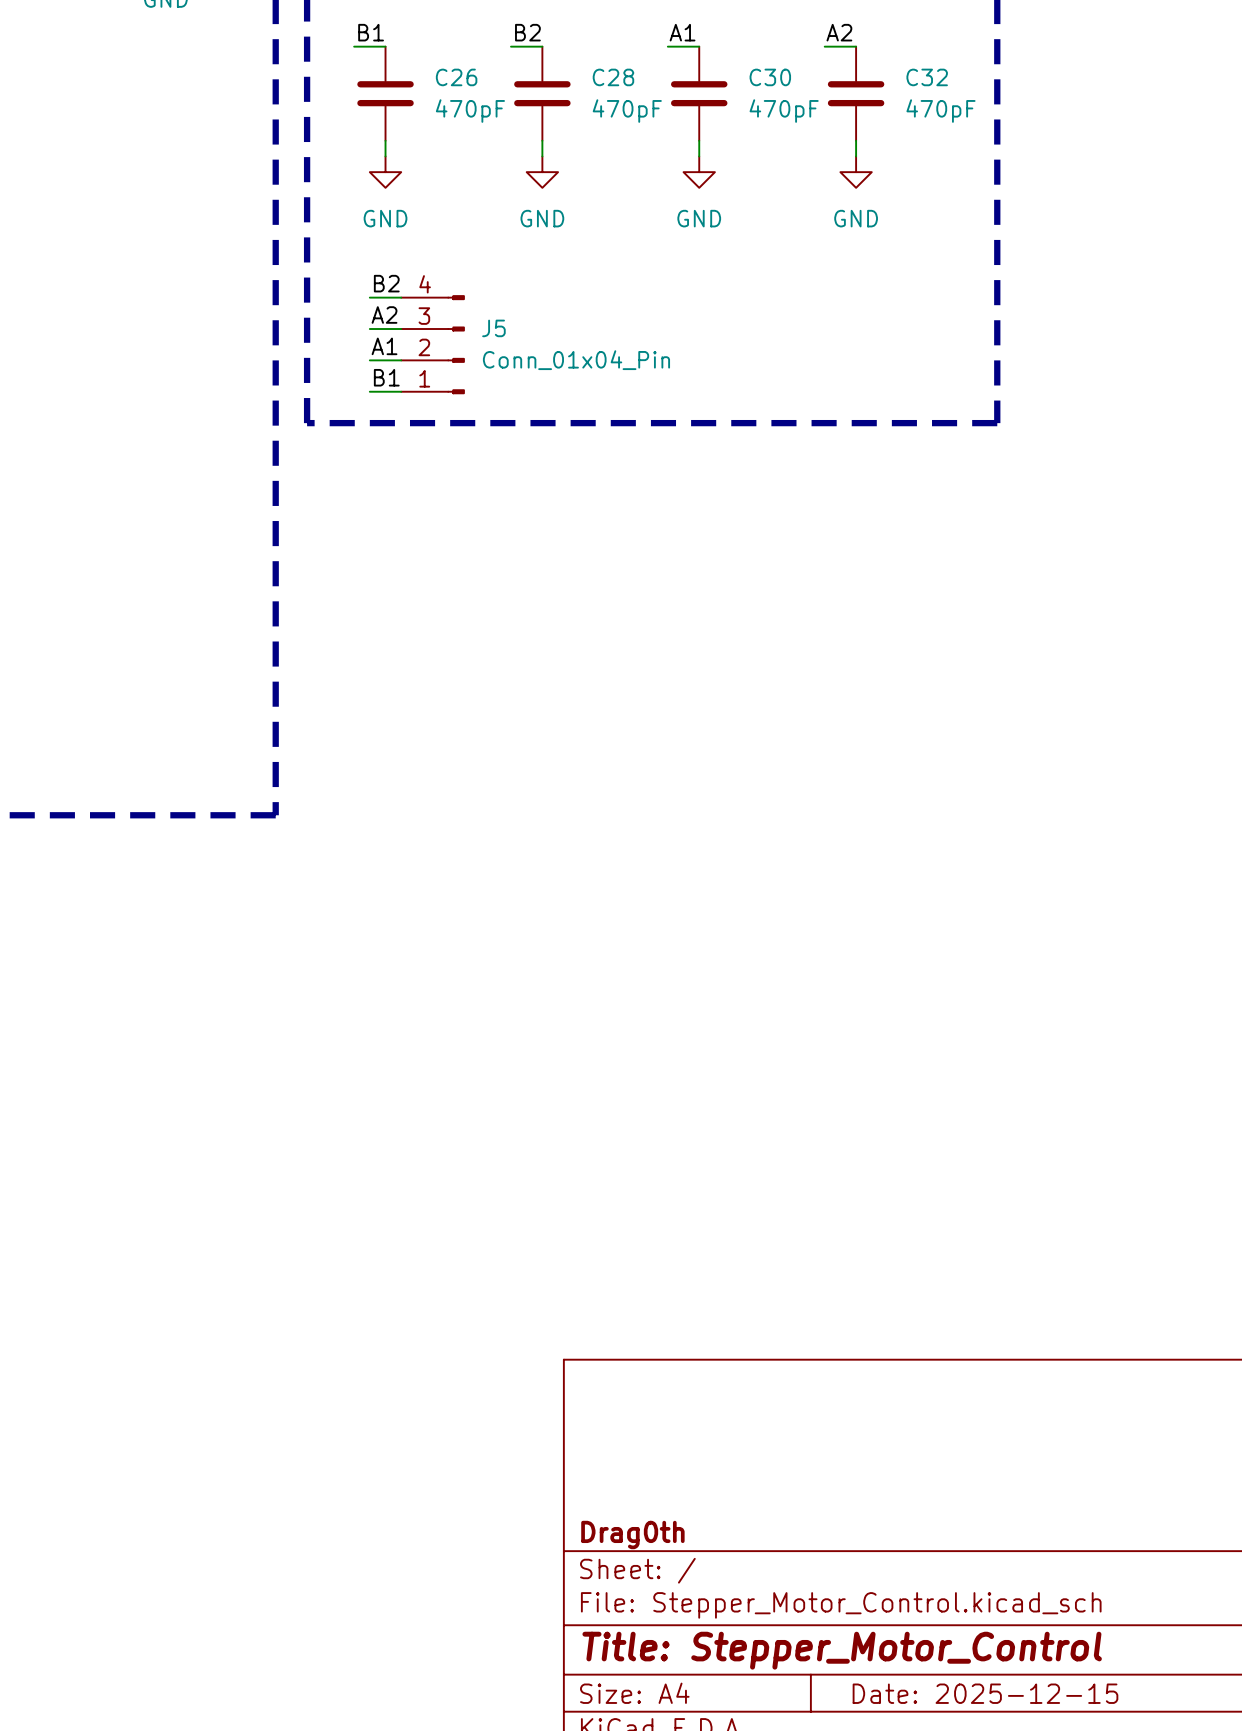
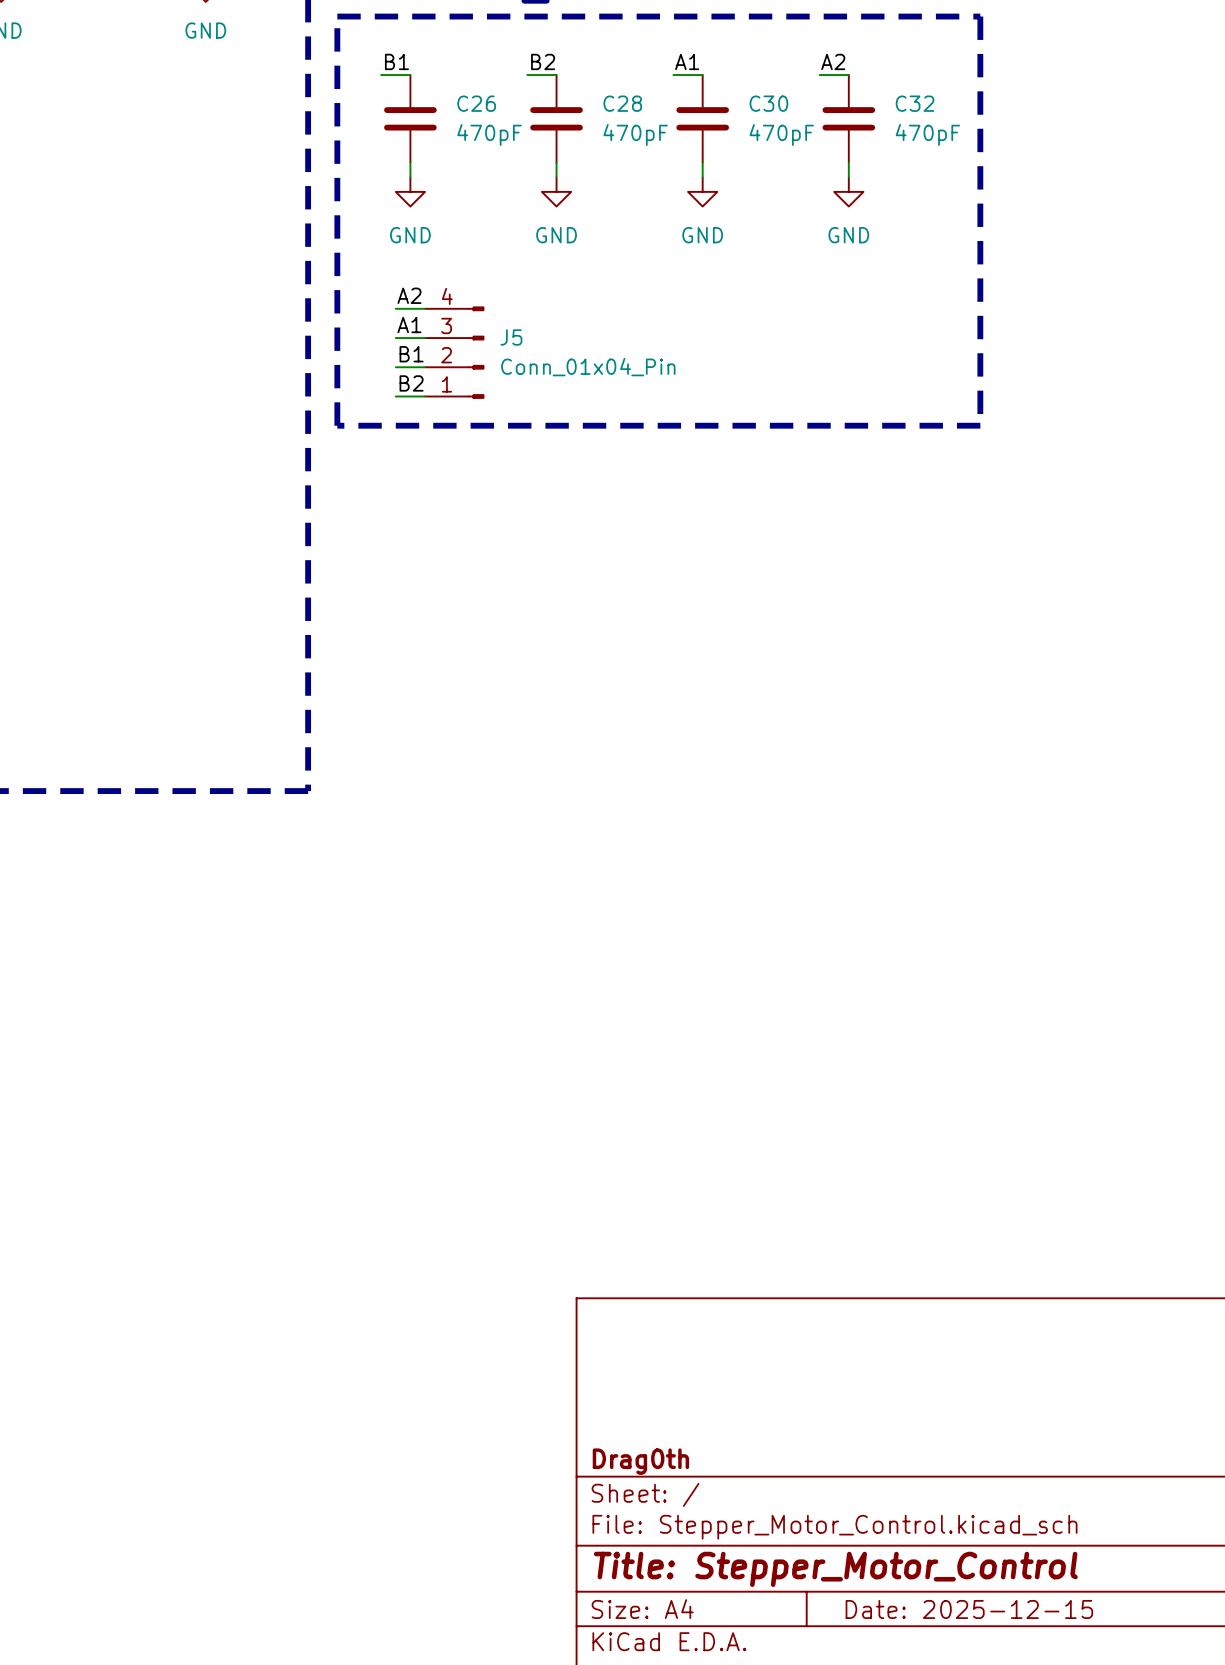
label: B2 (386, 283) -> A2 (409, 295)
label: A2 (384, 315) -> A1 (409, 325)
label: A1 (384, 346) -> B1 (411, 354)
label: B1 (386, 377) -> B2 (411, 383)

